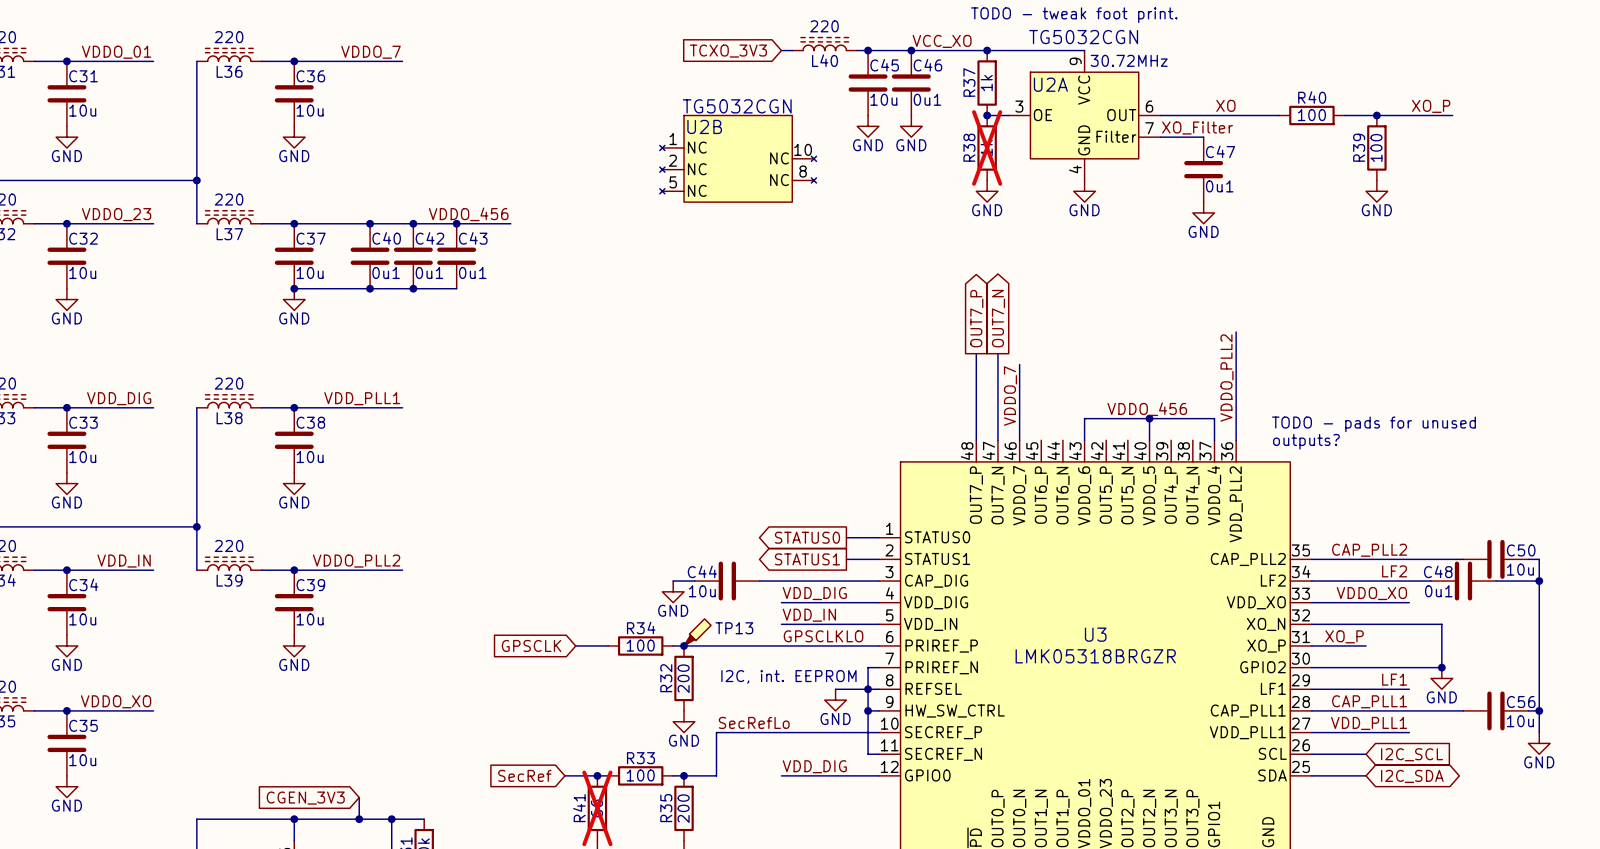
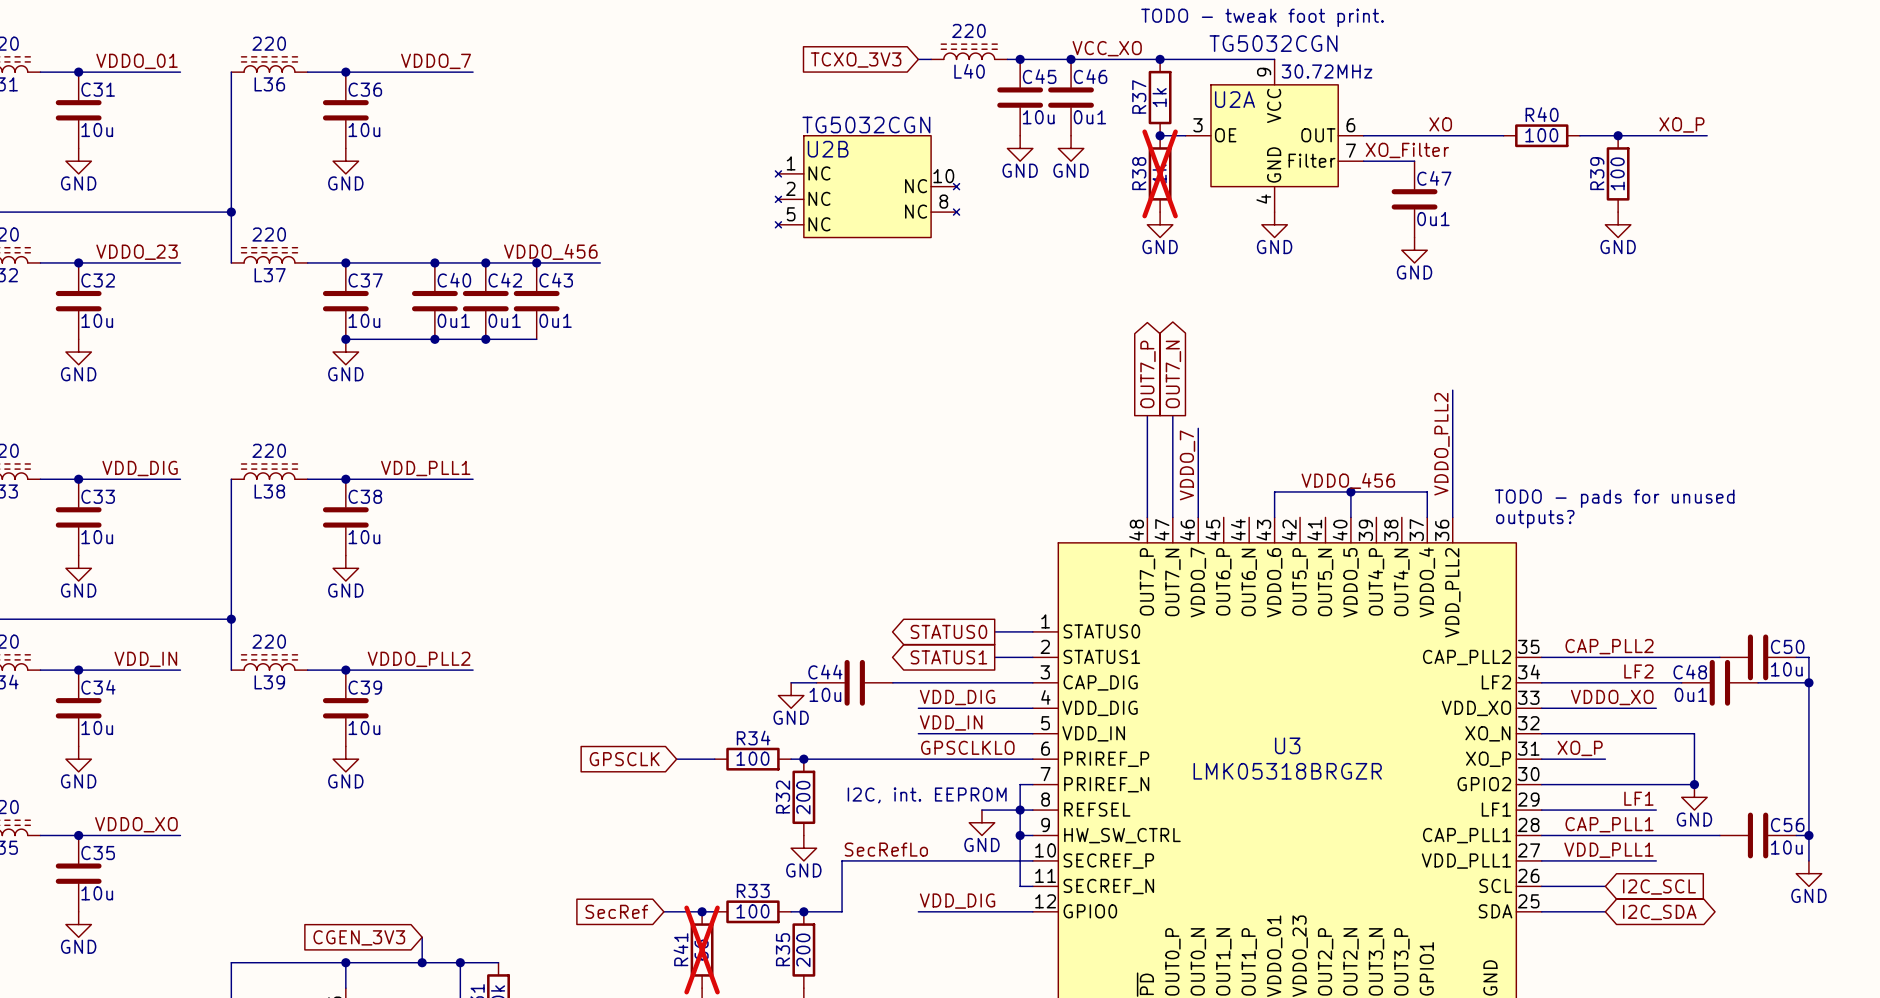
TP13: (697, 632) -> none

